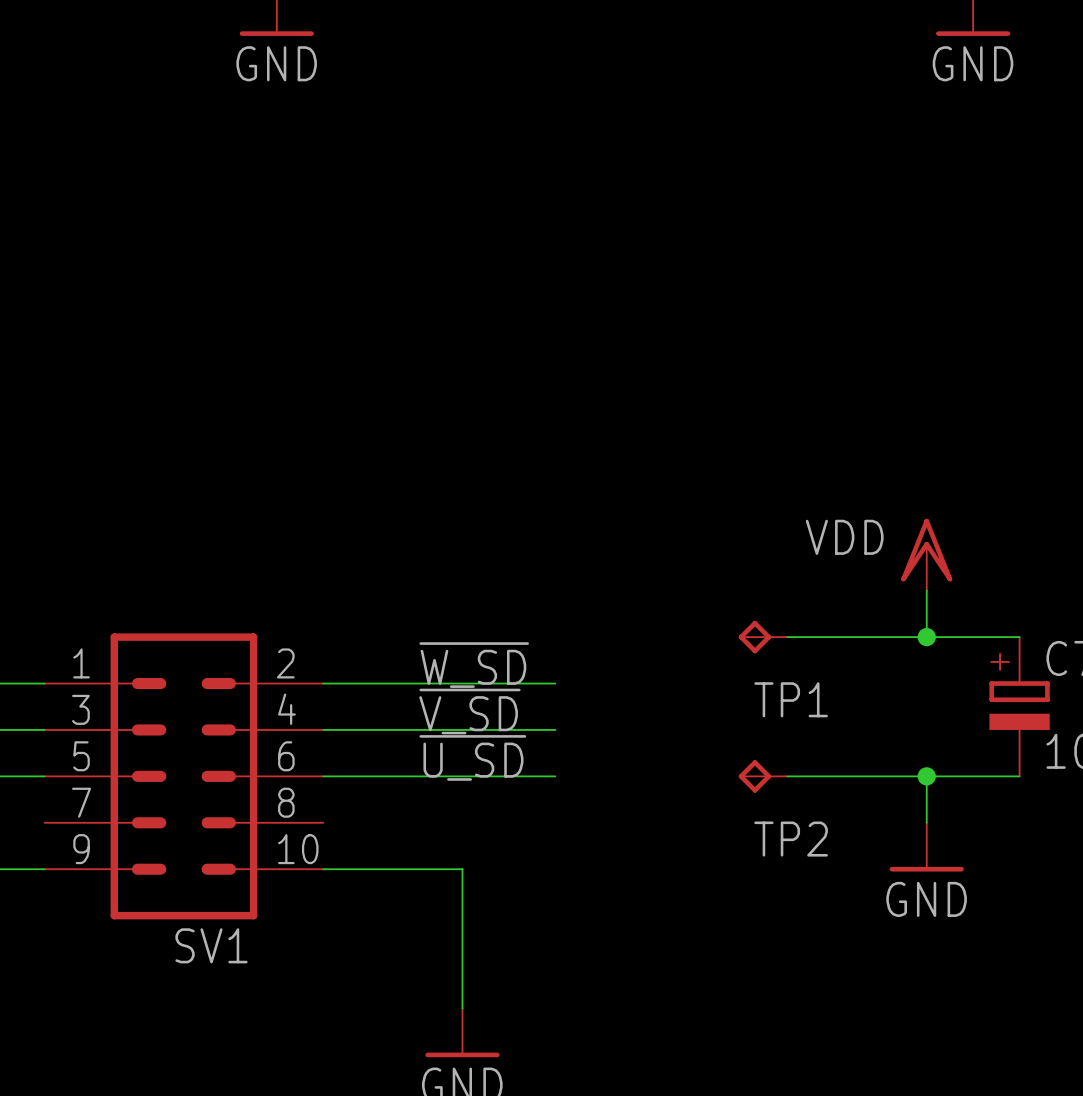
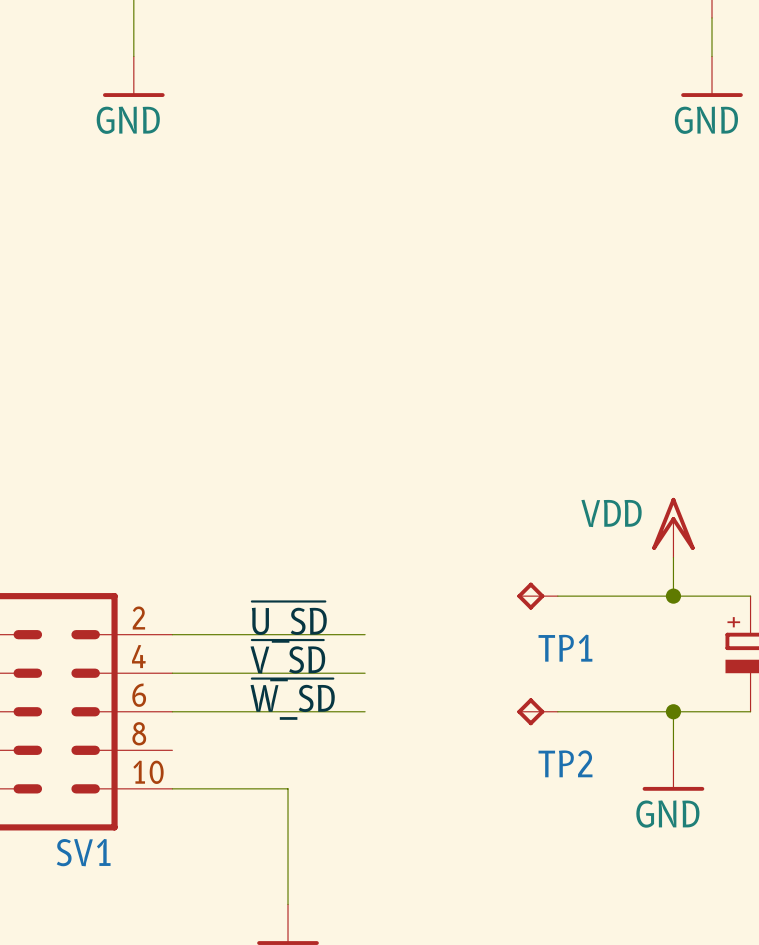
label: ~{W_SD} (474, 665) -> ~{U_SD} (289, 622)
label: ~{U_SD} (472, 757) -> ~{W_SD} (292, 699)

